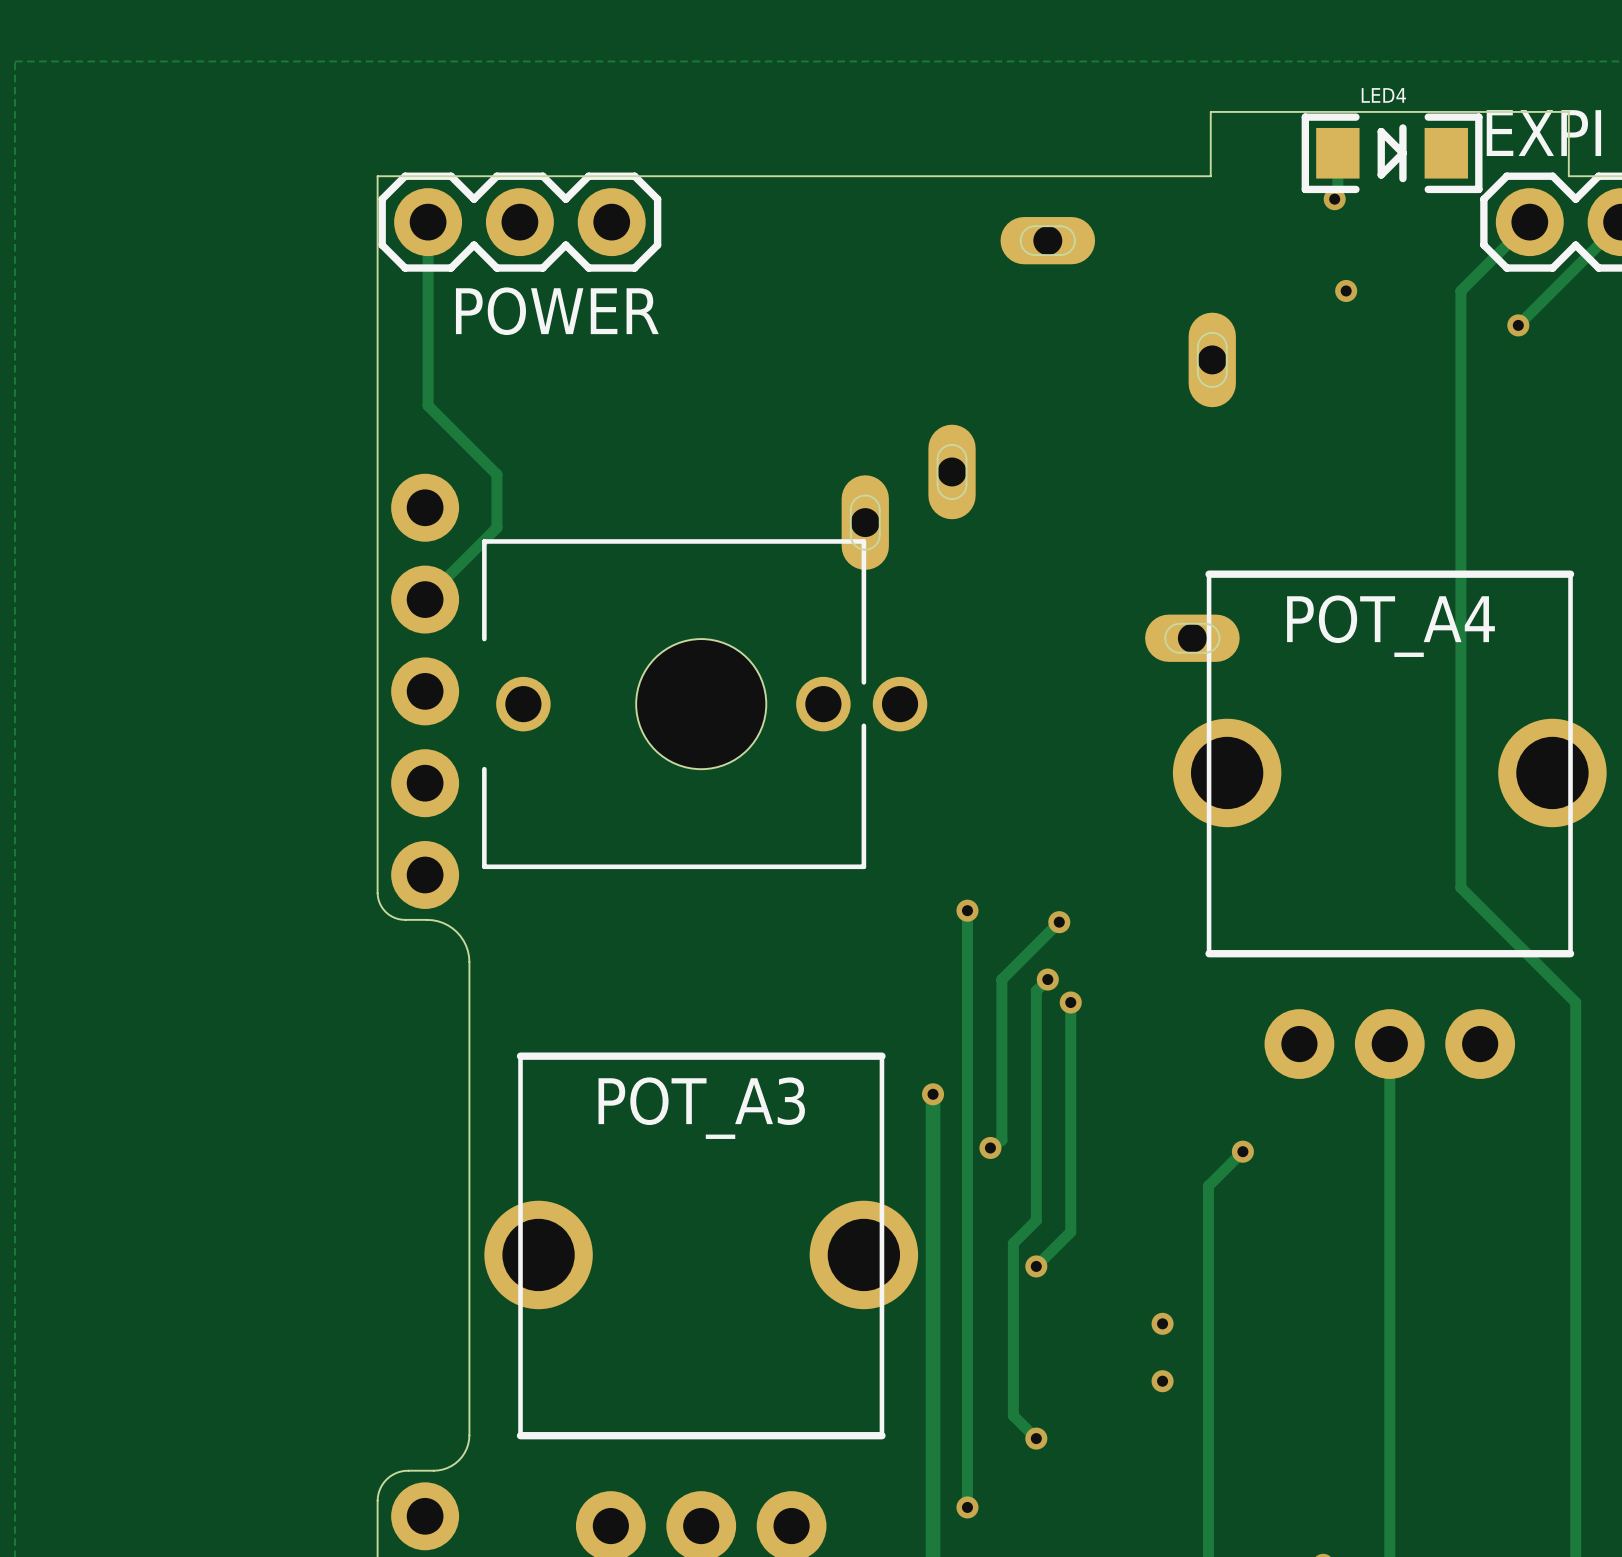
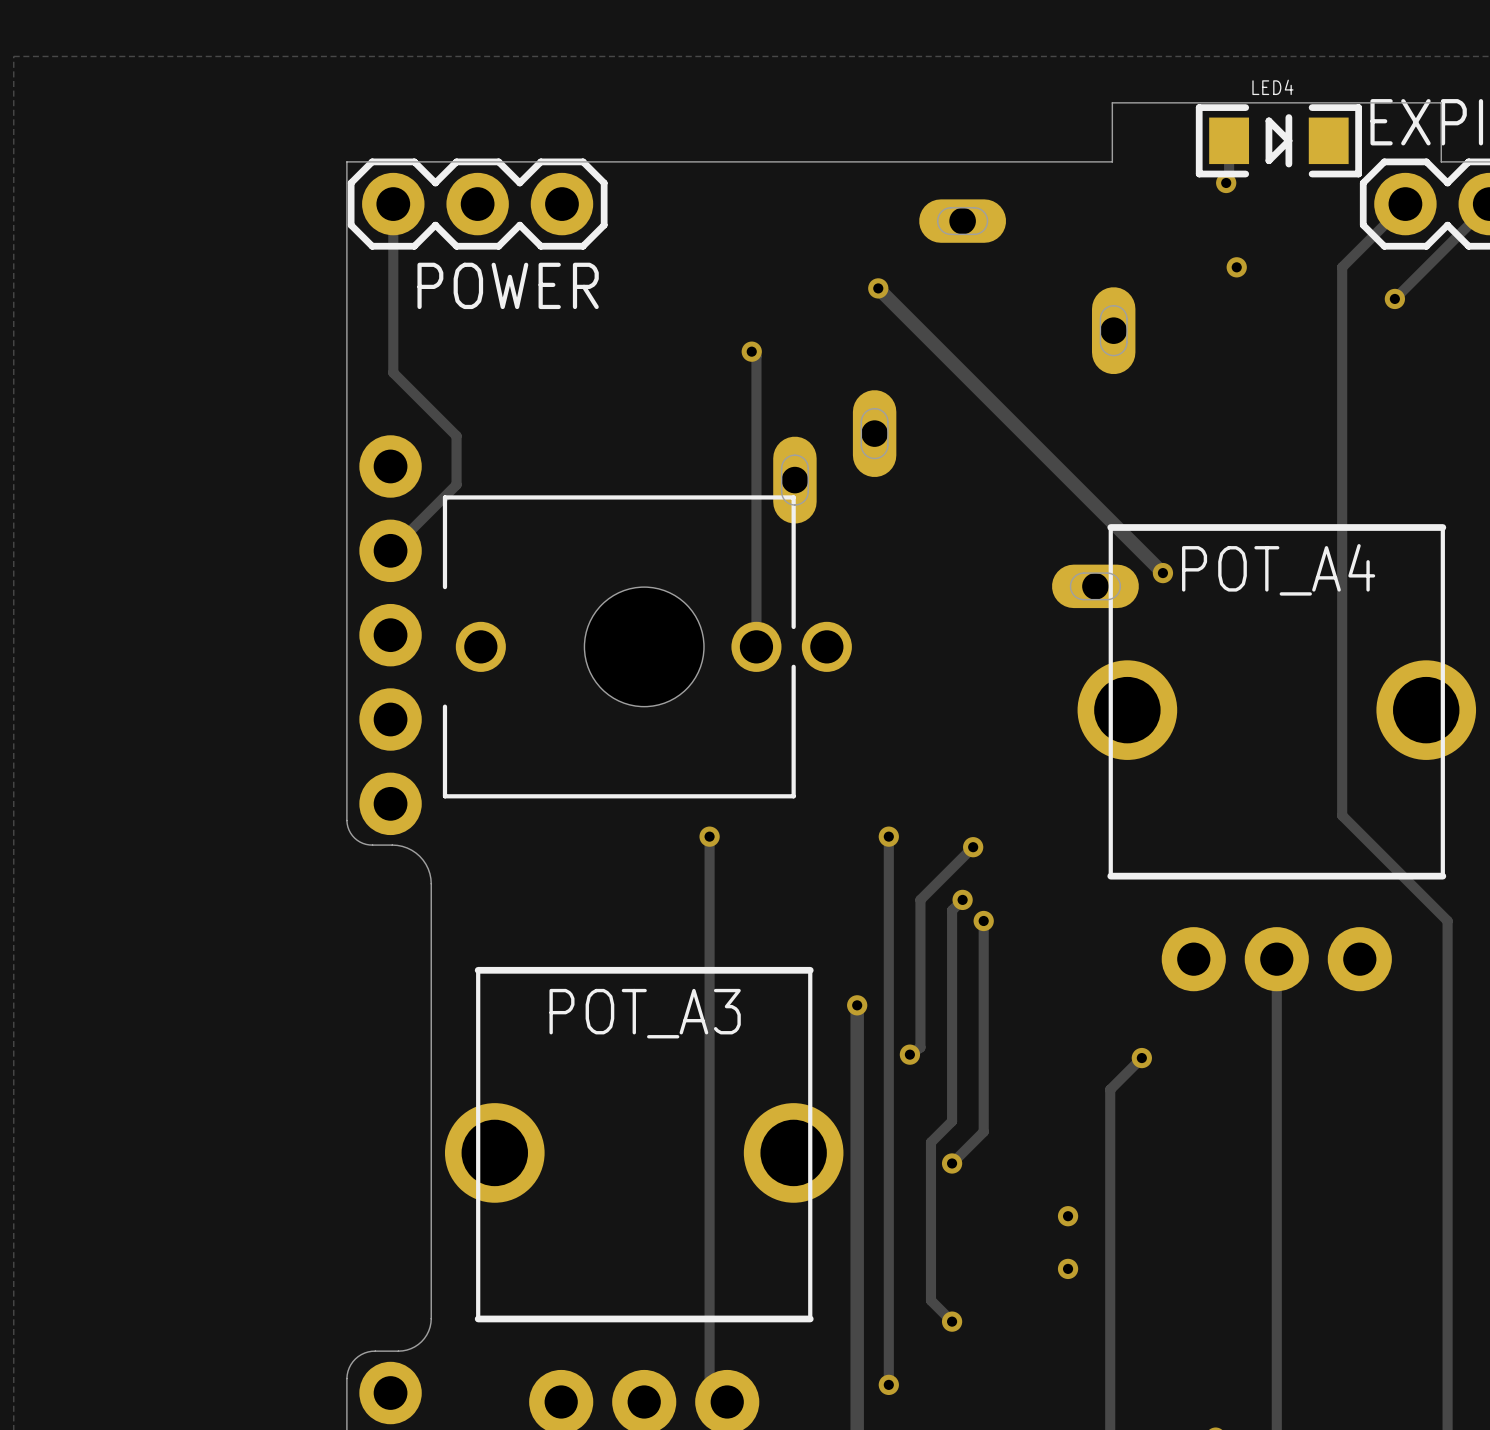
track: none -> (878, 288) (1162, 573)
via: none -> (878, 288)
track: none -> (751, 351) (756, 356) (756, 646)
via: none -> (751, 351)
via: none -> (1162, 573)
track: none -> (709, 836) (709, 1384) (727, 1401)
via: none -> (709, 836)

